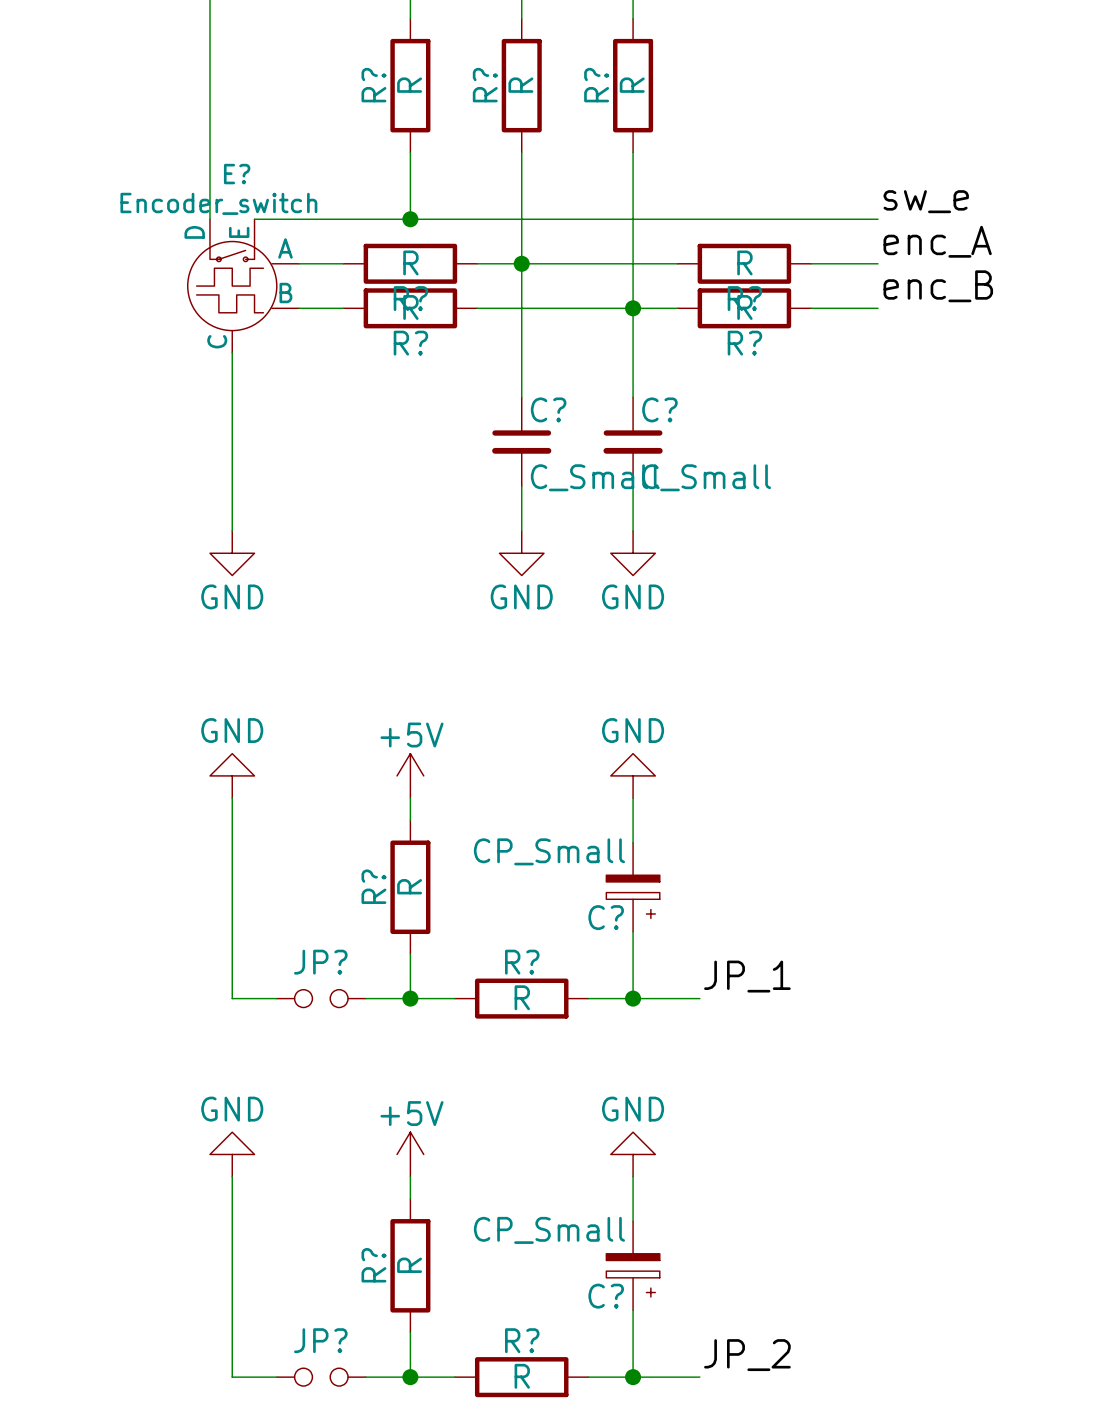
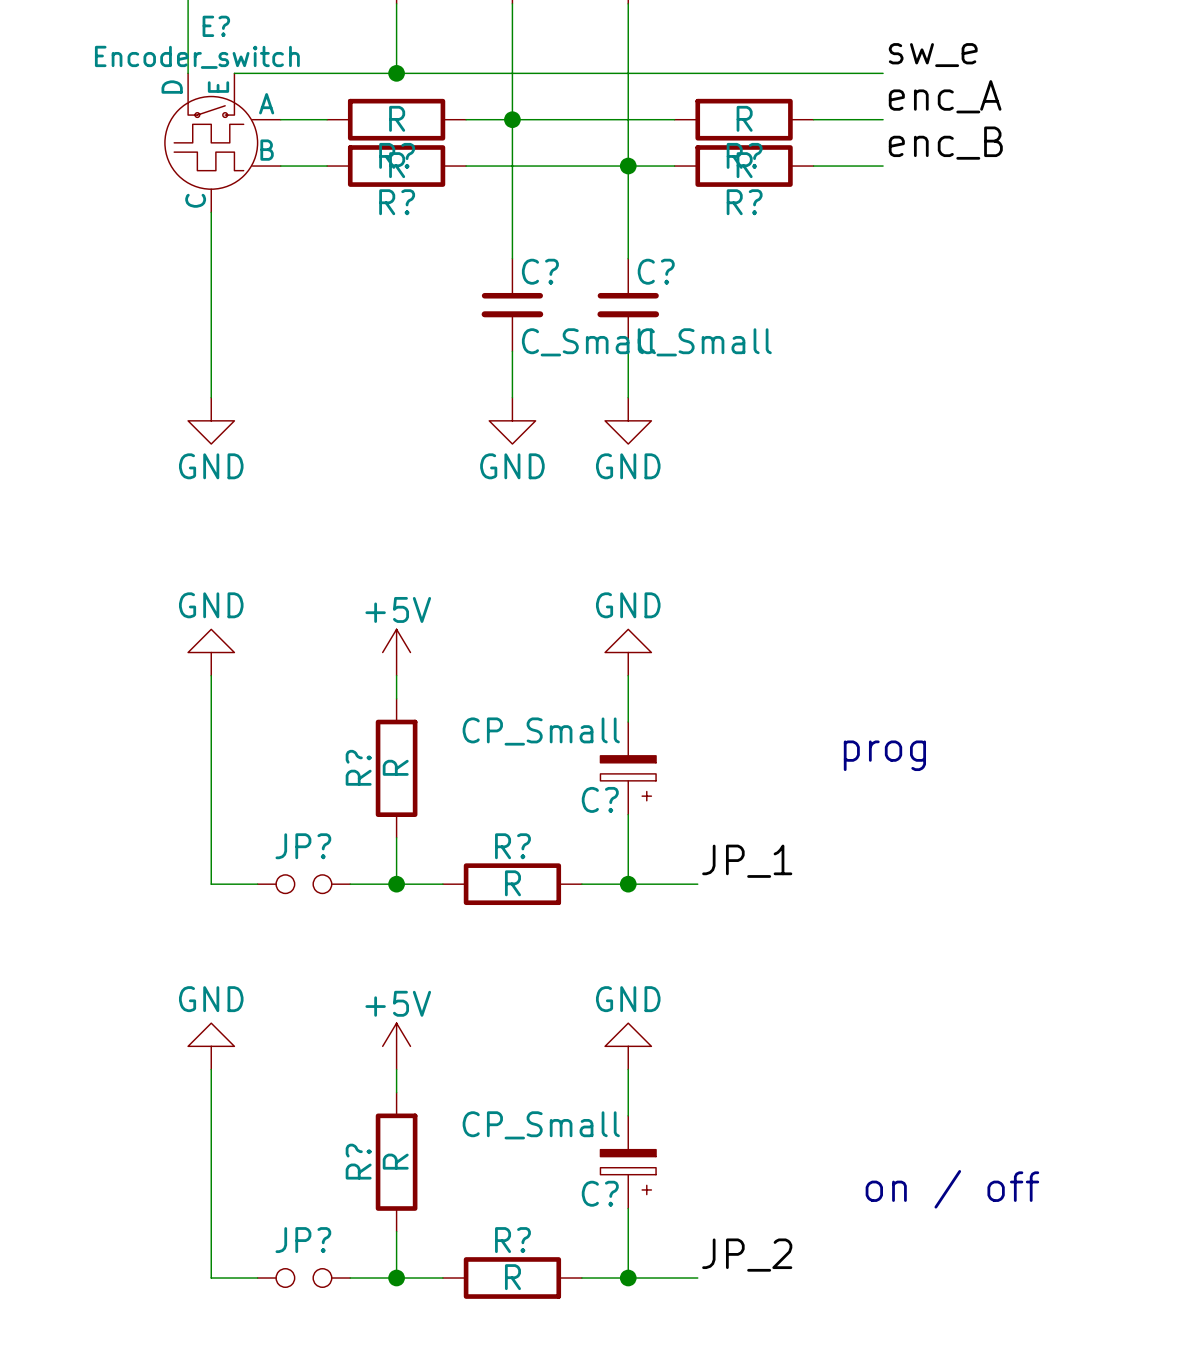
text: none -> prog (884, 755)
text: none -> on / off (952, 1189)

